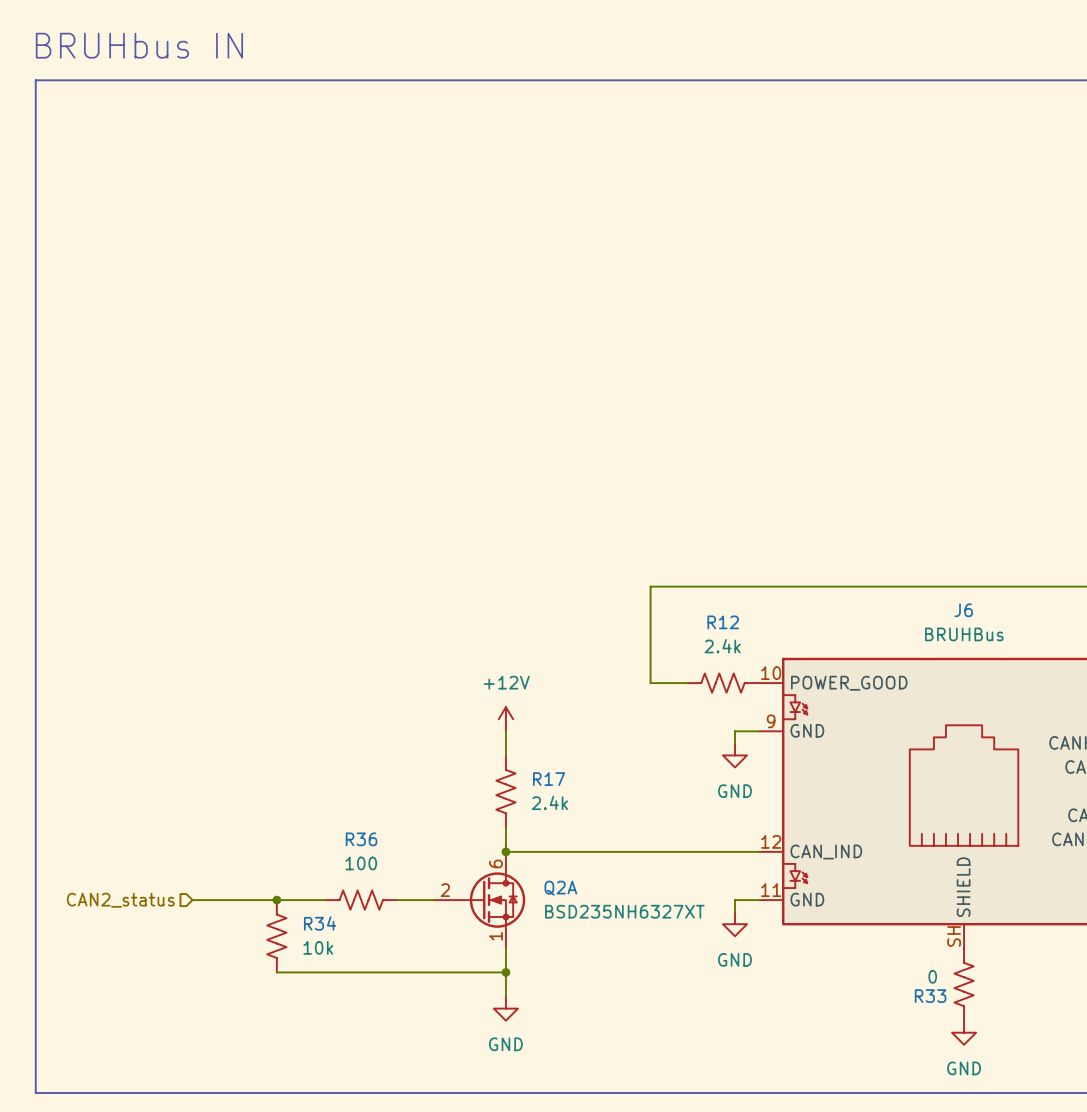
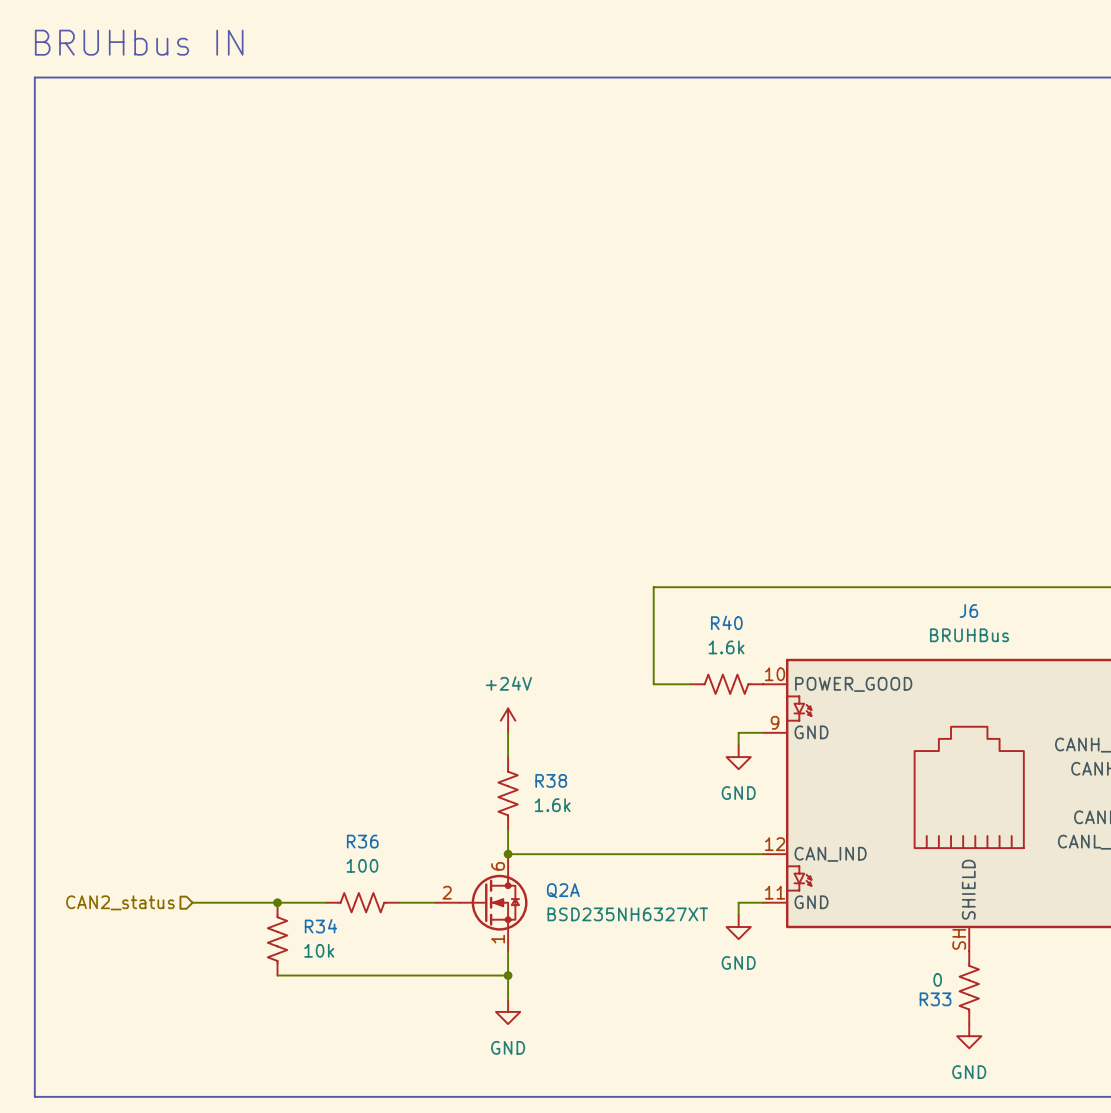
R12 name: R12 (723, 622) -> R40 (726, 622)
R12 value: 2.4k (722, 646) -> 1.6k (726, 647)
power symbol: +12V (505, 719) -> +24V (508, 720)
R17 name: R17 (549, 779) -> R38 (551, 780)
R17 value: 2.4k (549, 802) -> 1.6k (552, 805)

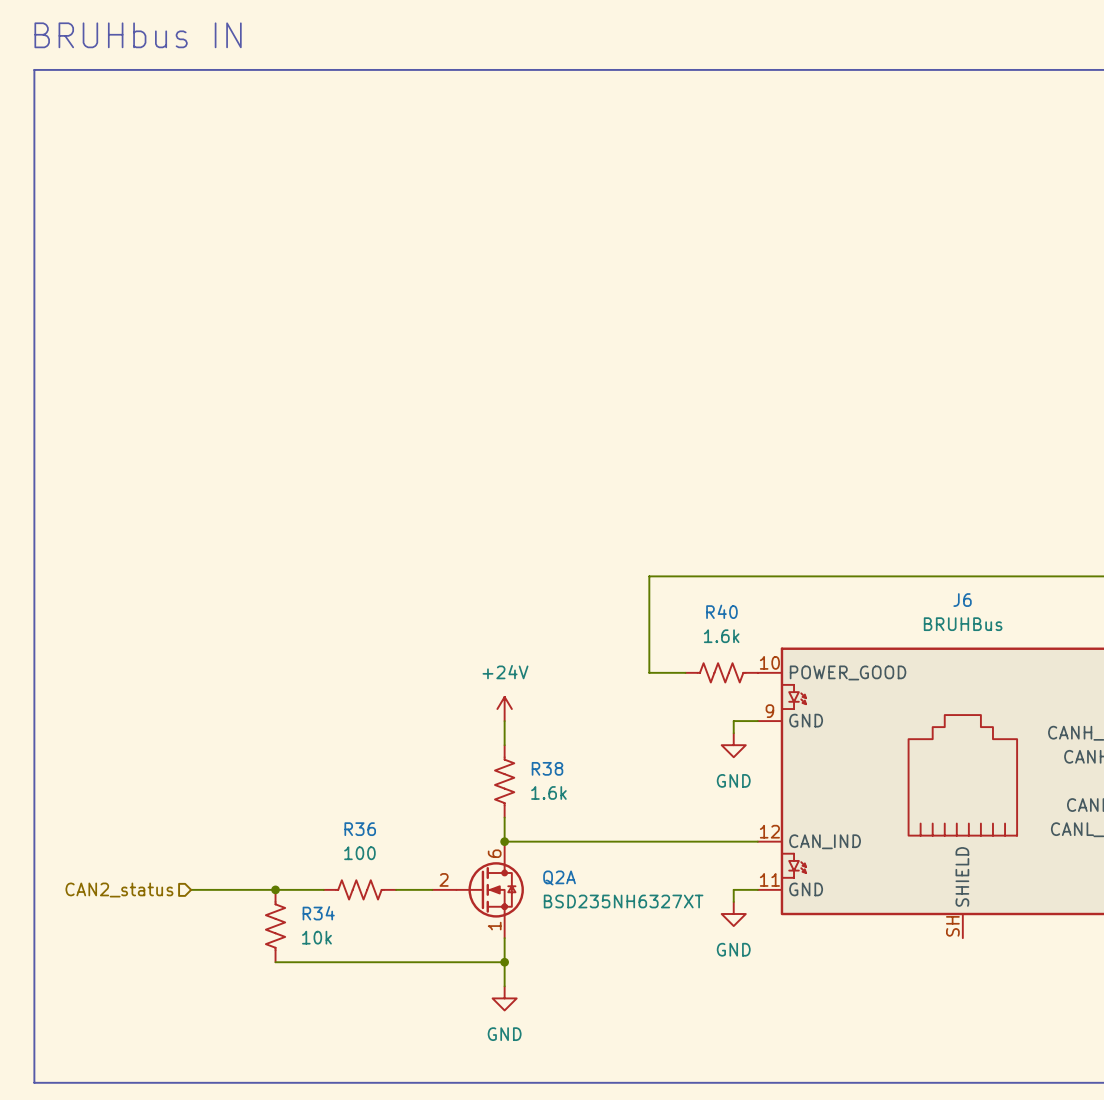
R33: 0 (969, 987) -> none
power symbol: GND (969, 1036) -> none

